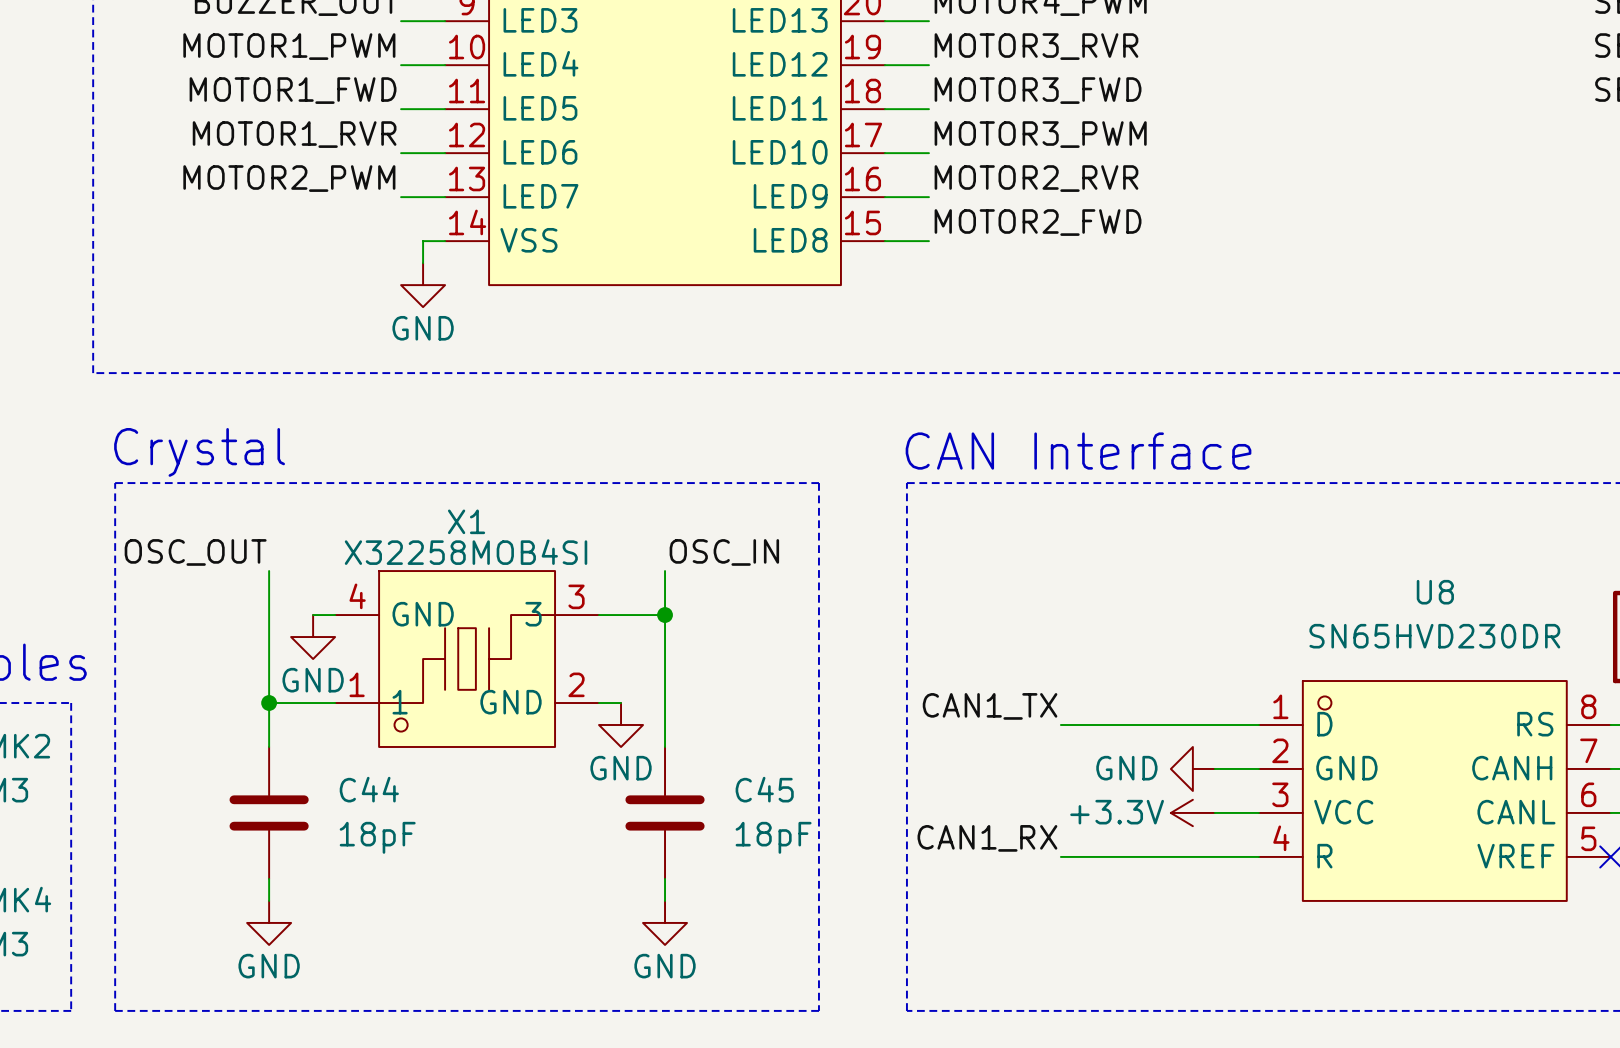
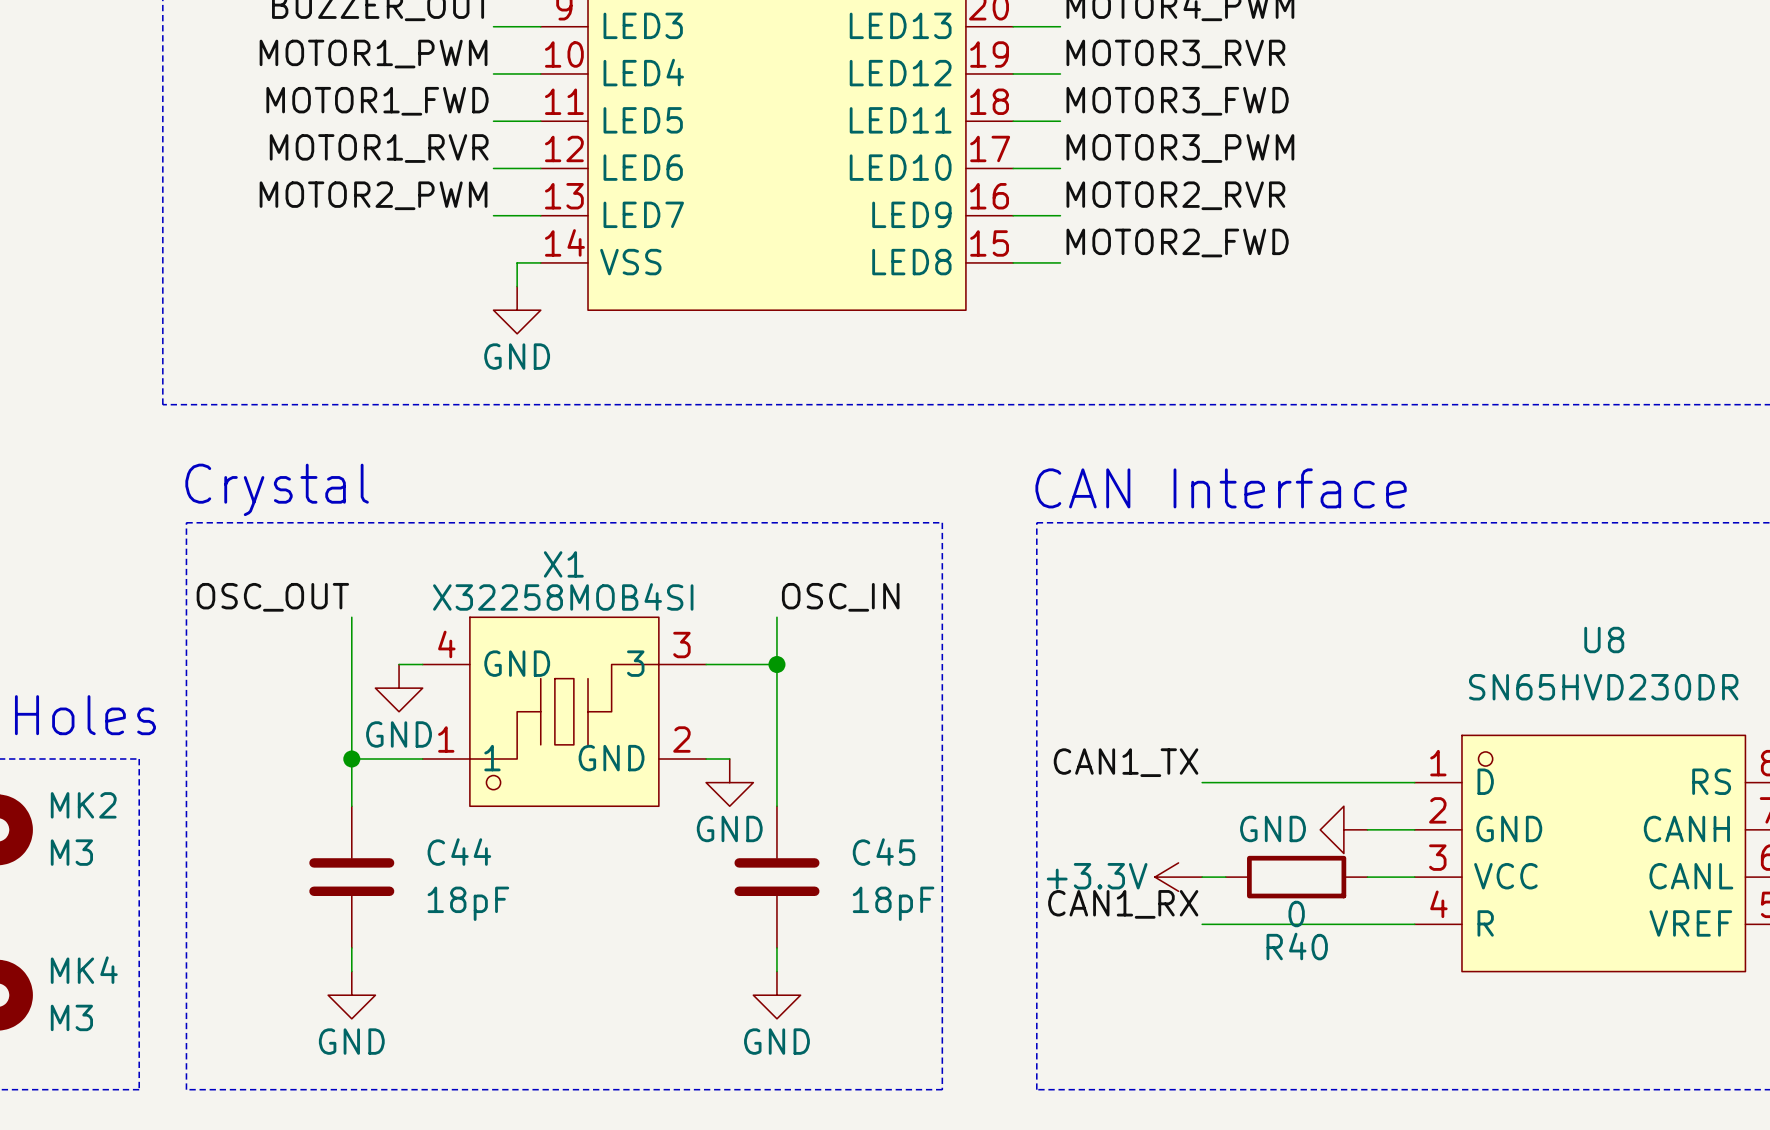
wire: none -> (1202, 877) (1225, 877)
R40: none -> 0 (1296, 877)
power symbol position: +3.3V (1192, 812) -> +3.3V (1178, 877)

